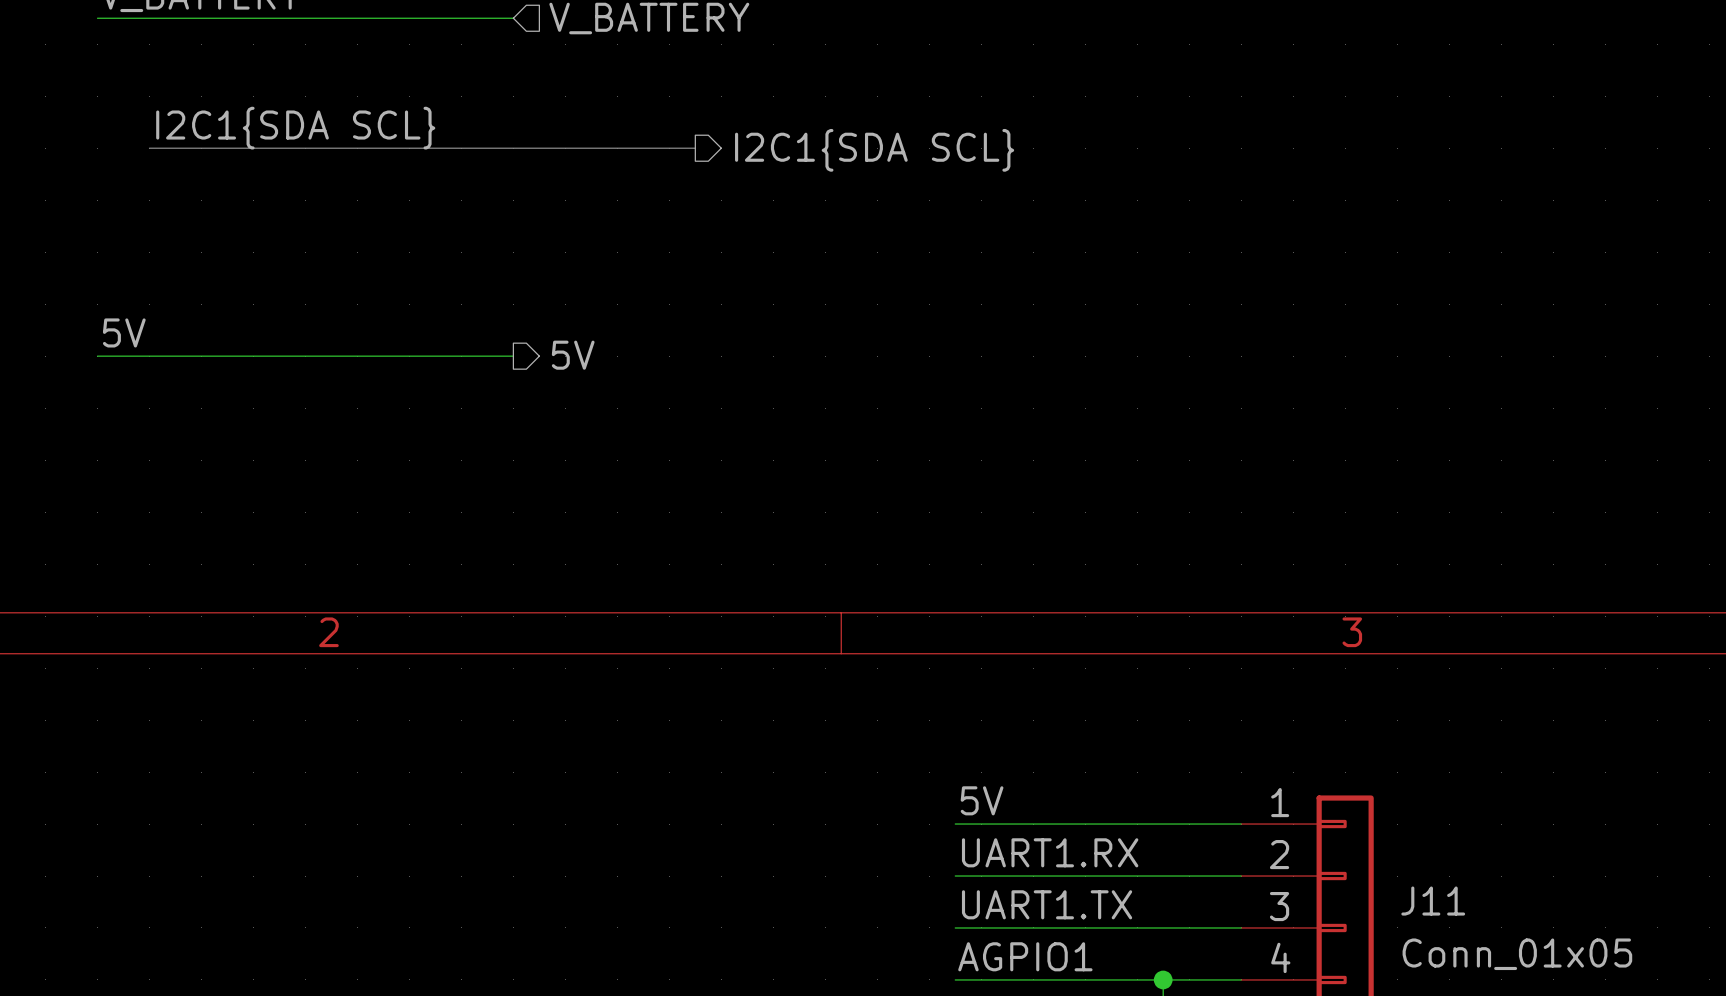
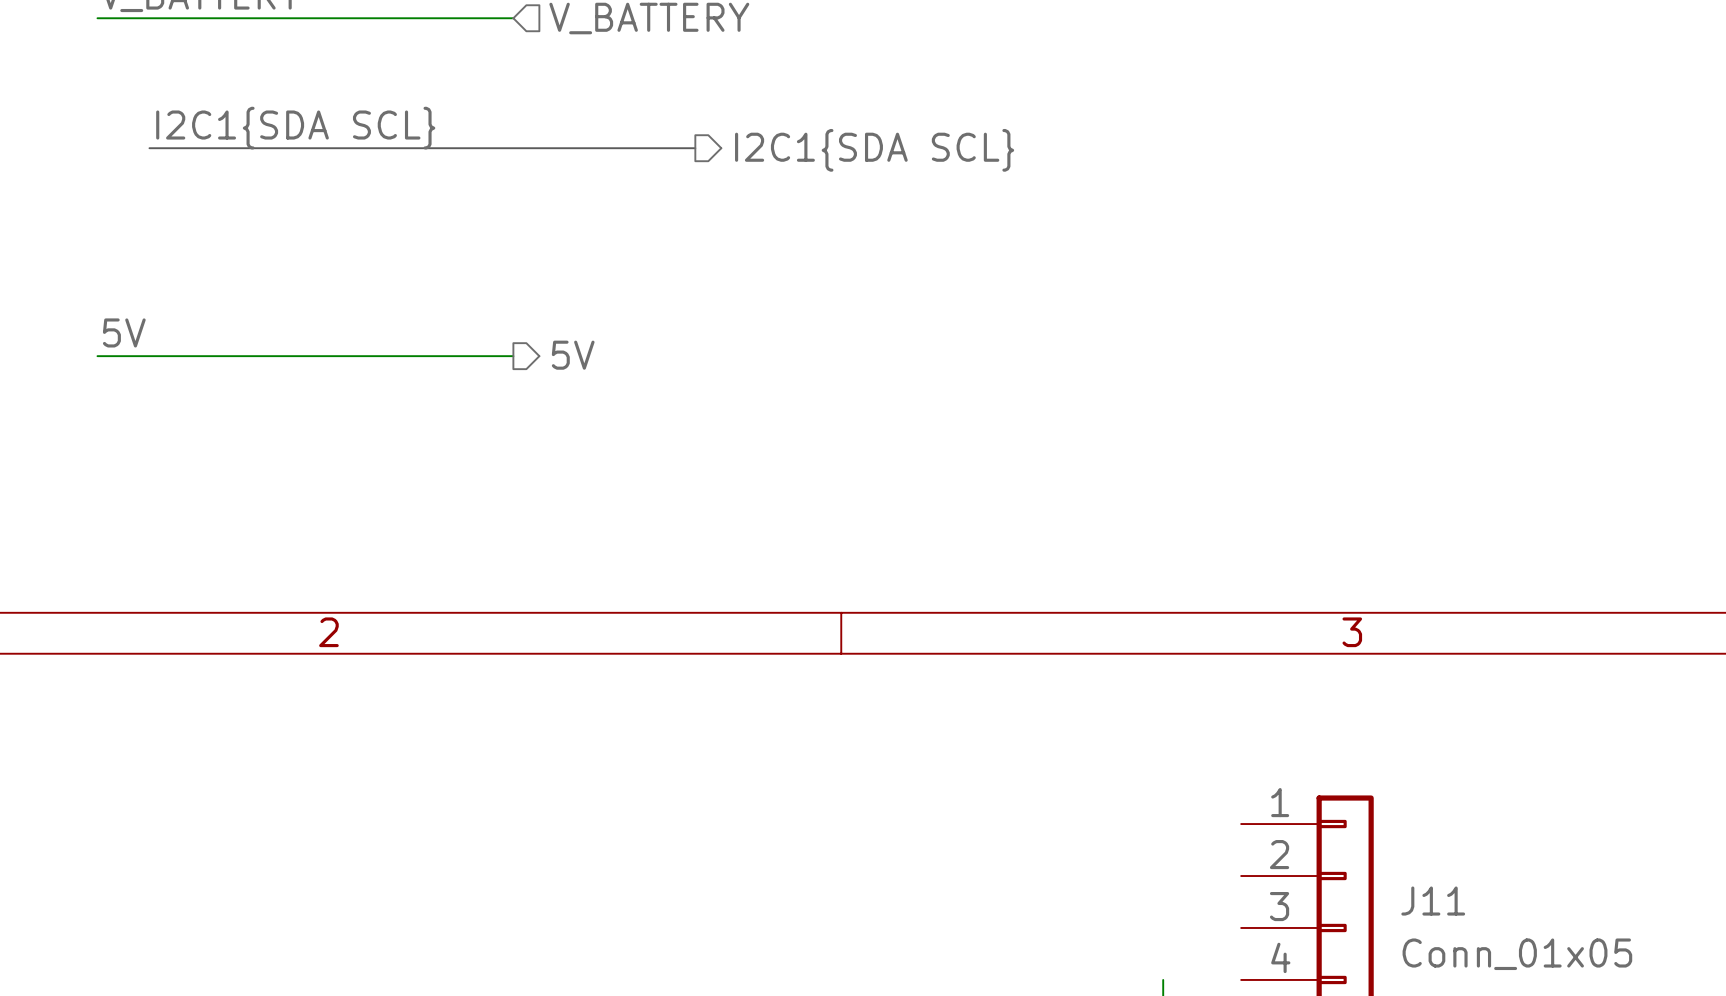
label: 5V (982, 800) -> none
wire: (955, 824) (1241, 824) -> none
label: UART1.RX (1050, 852) -> none
wire: (955, 876) (1241, 876) -> none
label: UART1.TX (1047, 904) -> none
wire: (955, 927) (1241, 927) -> none
label: AGPIO1 (1025, 956) -> none
wire: (955, 979) (1241, 979) -> none
junction: (1163, 979) -> none

